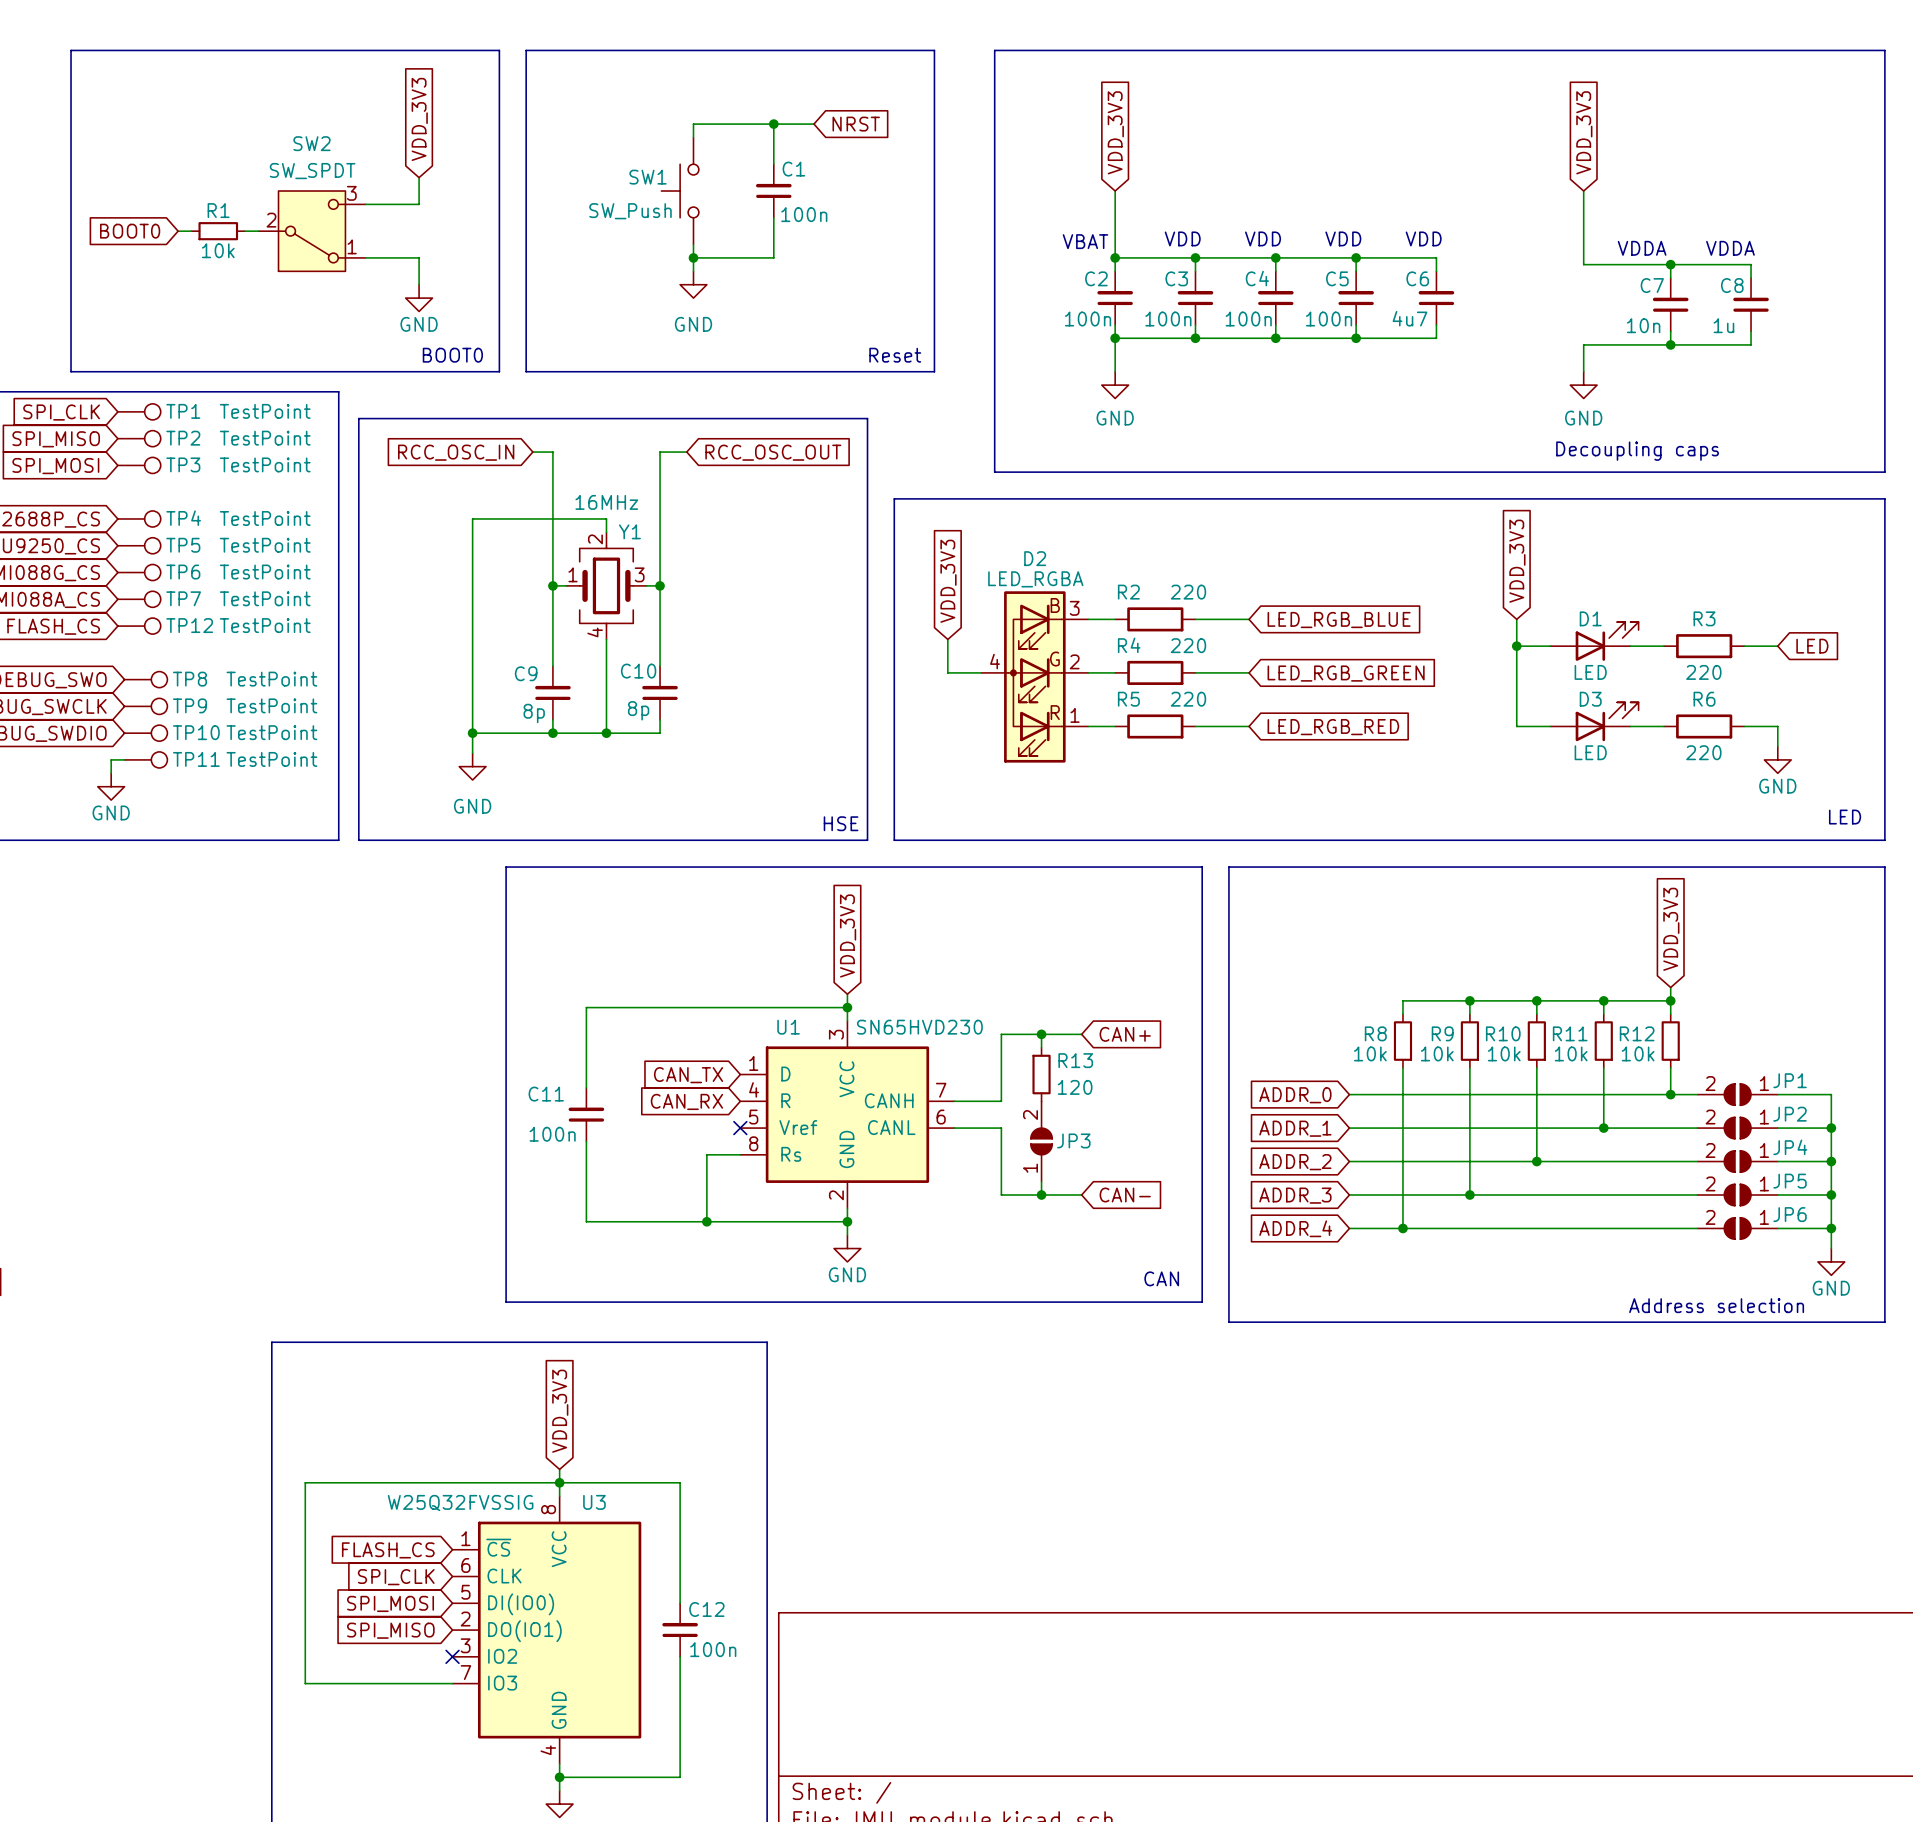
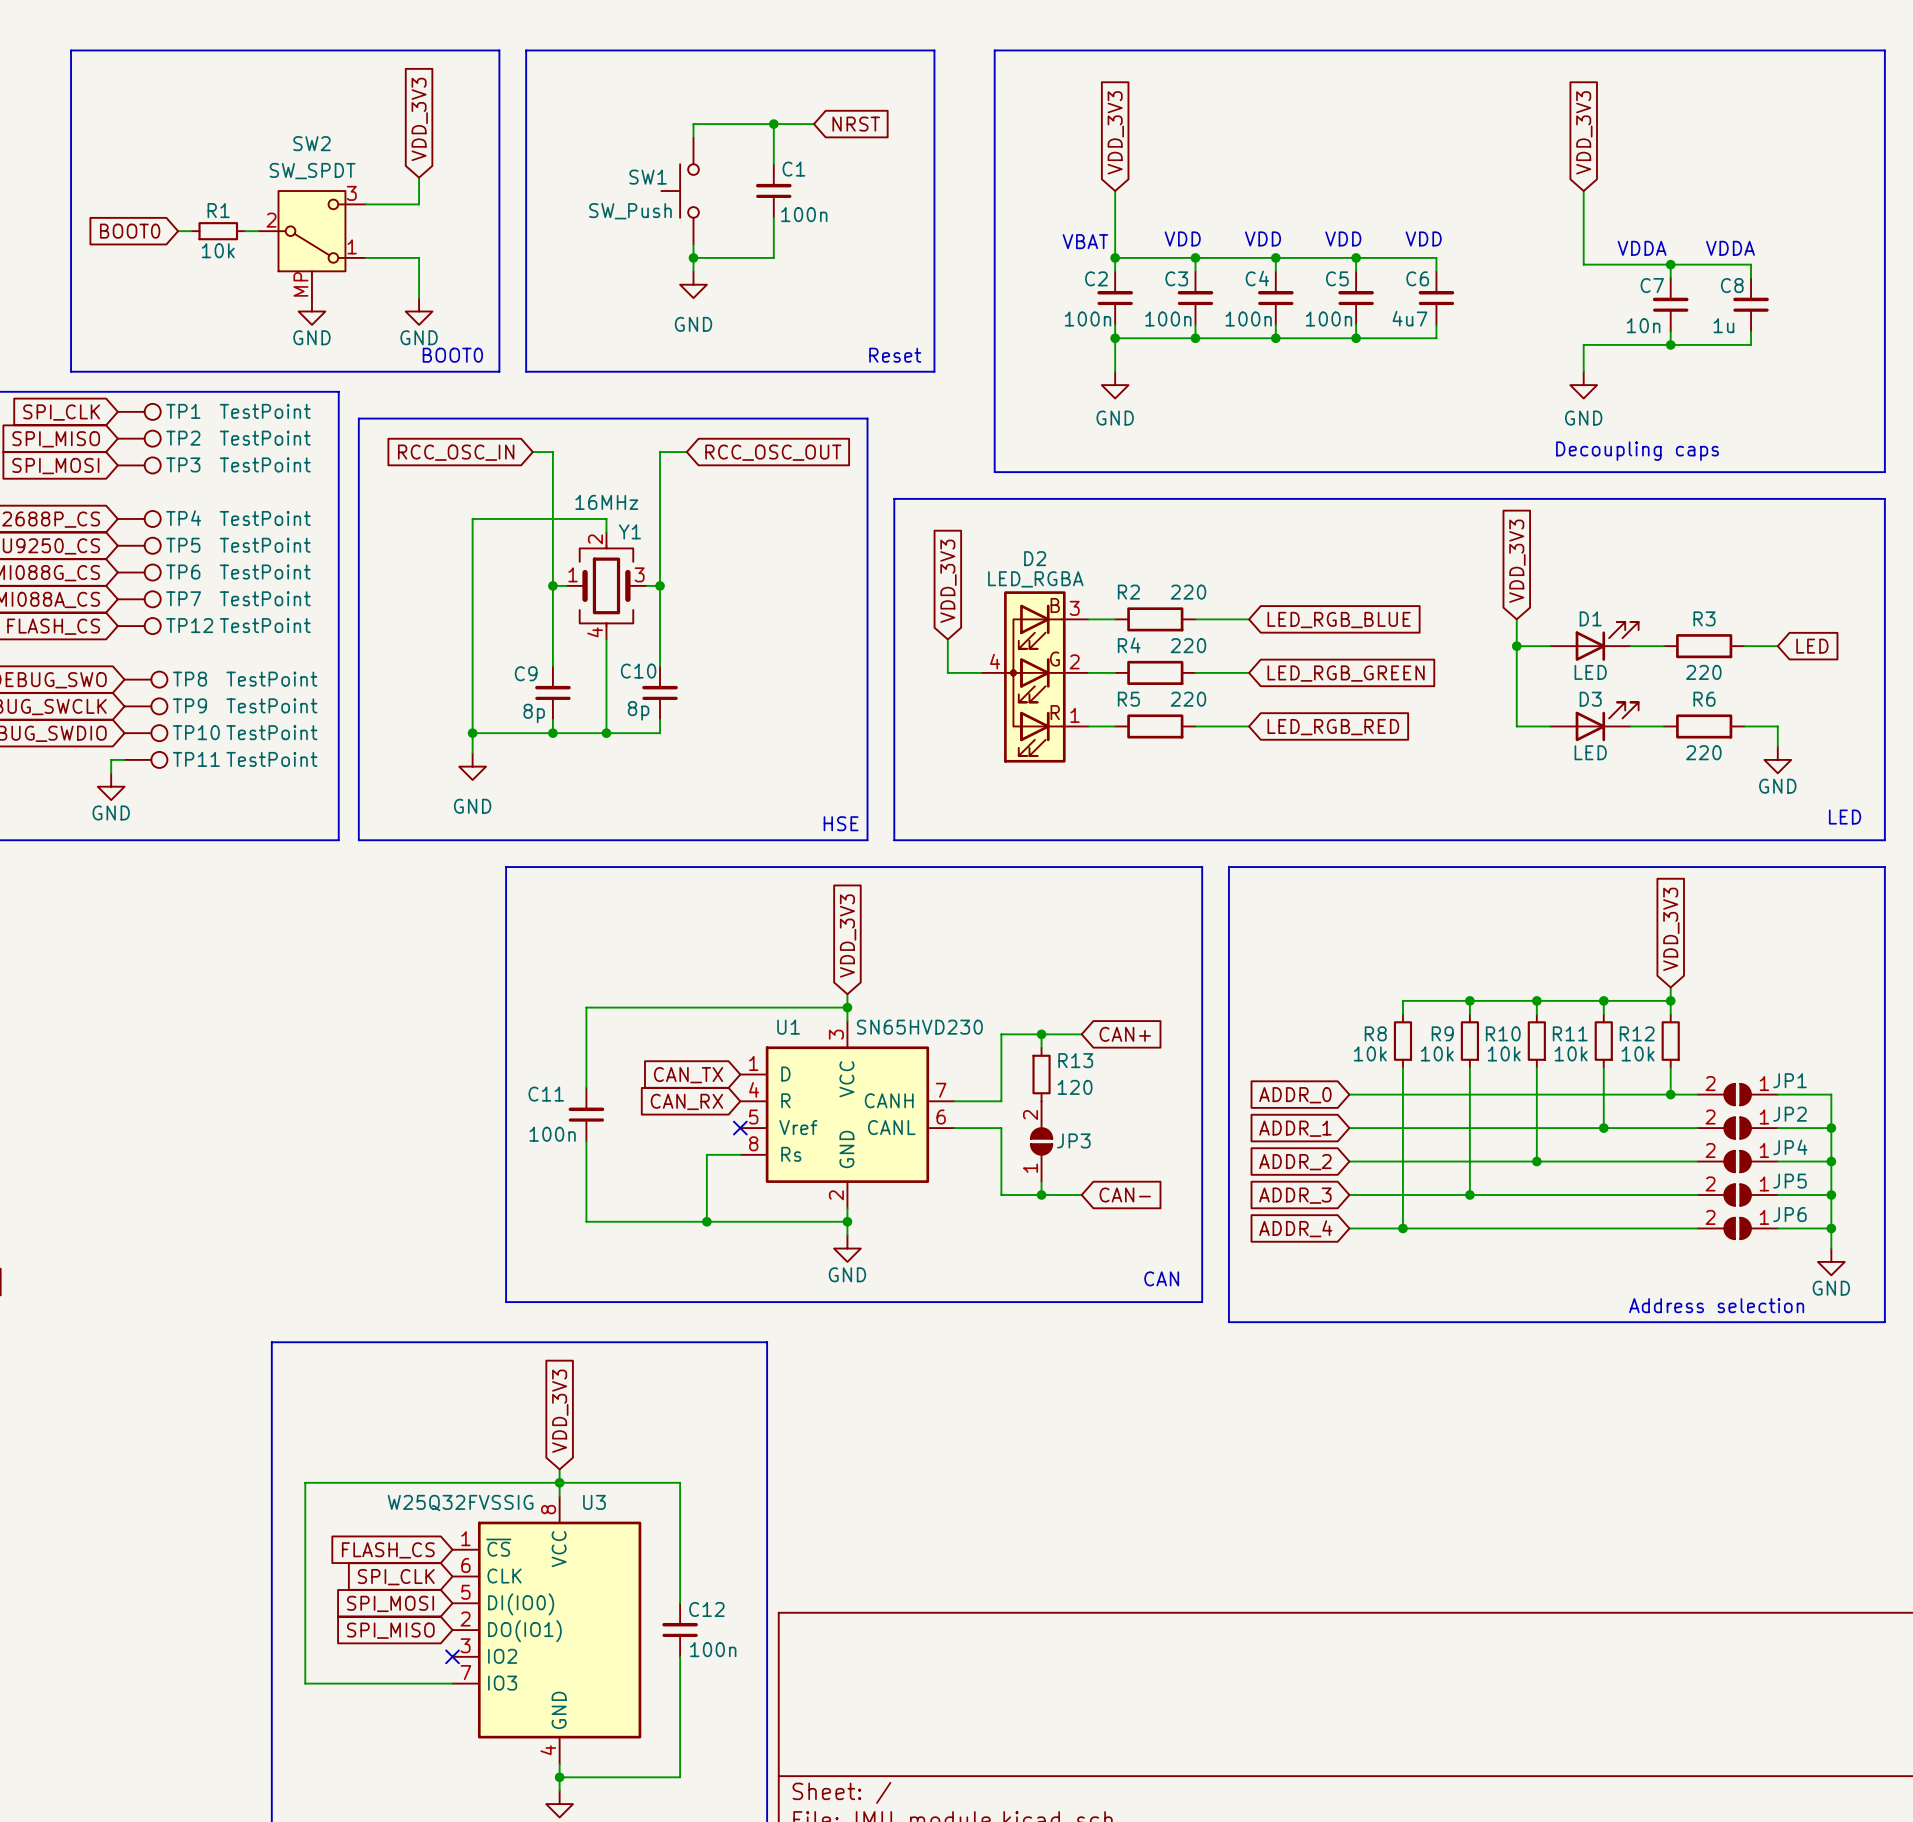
SW2 symbol: [258, 191, 366, 272] -> [258, 191, 366, 299]
power symbol position: GND (419, 298) -> GND (419, 311)
power symbol: none -> GND (311, 311)

